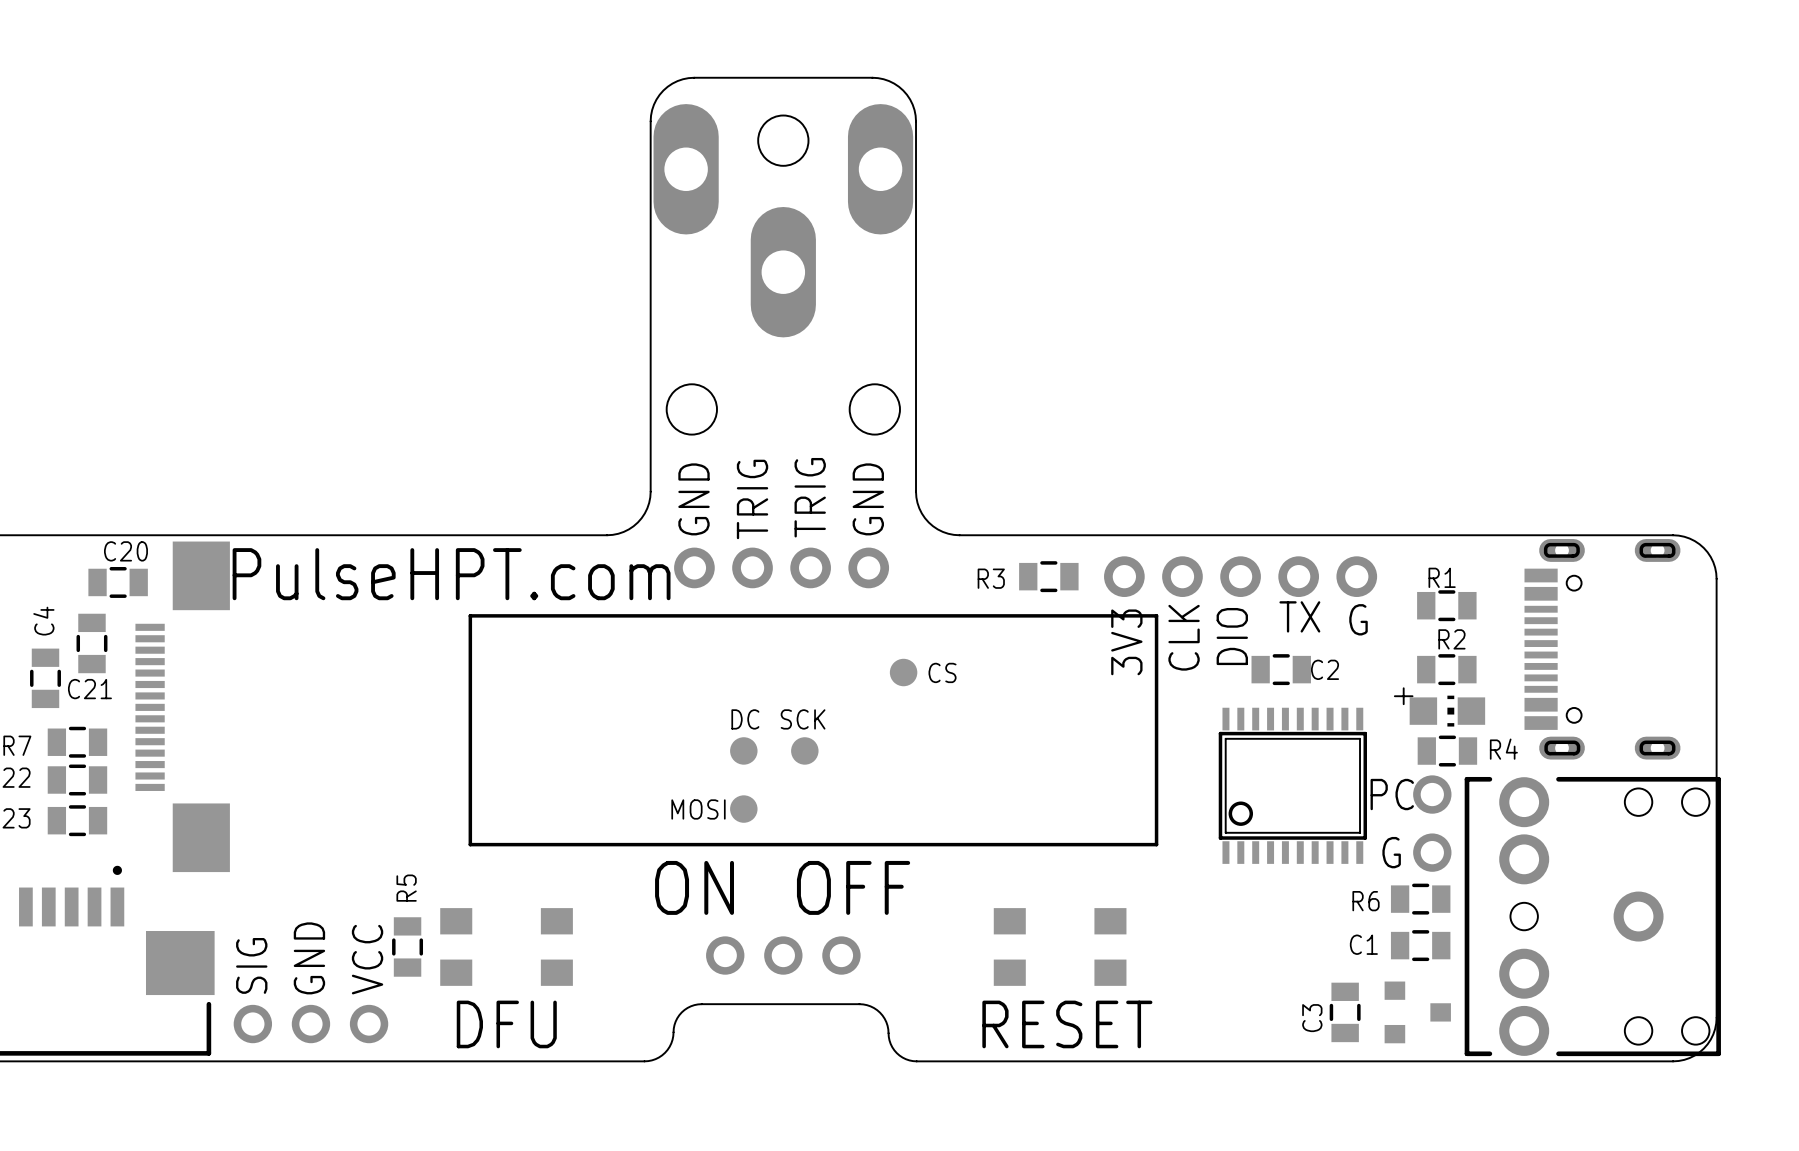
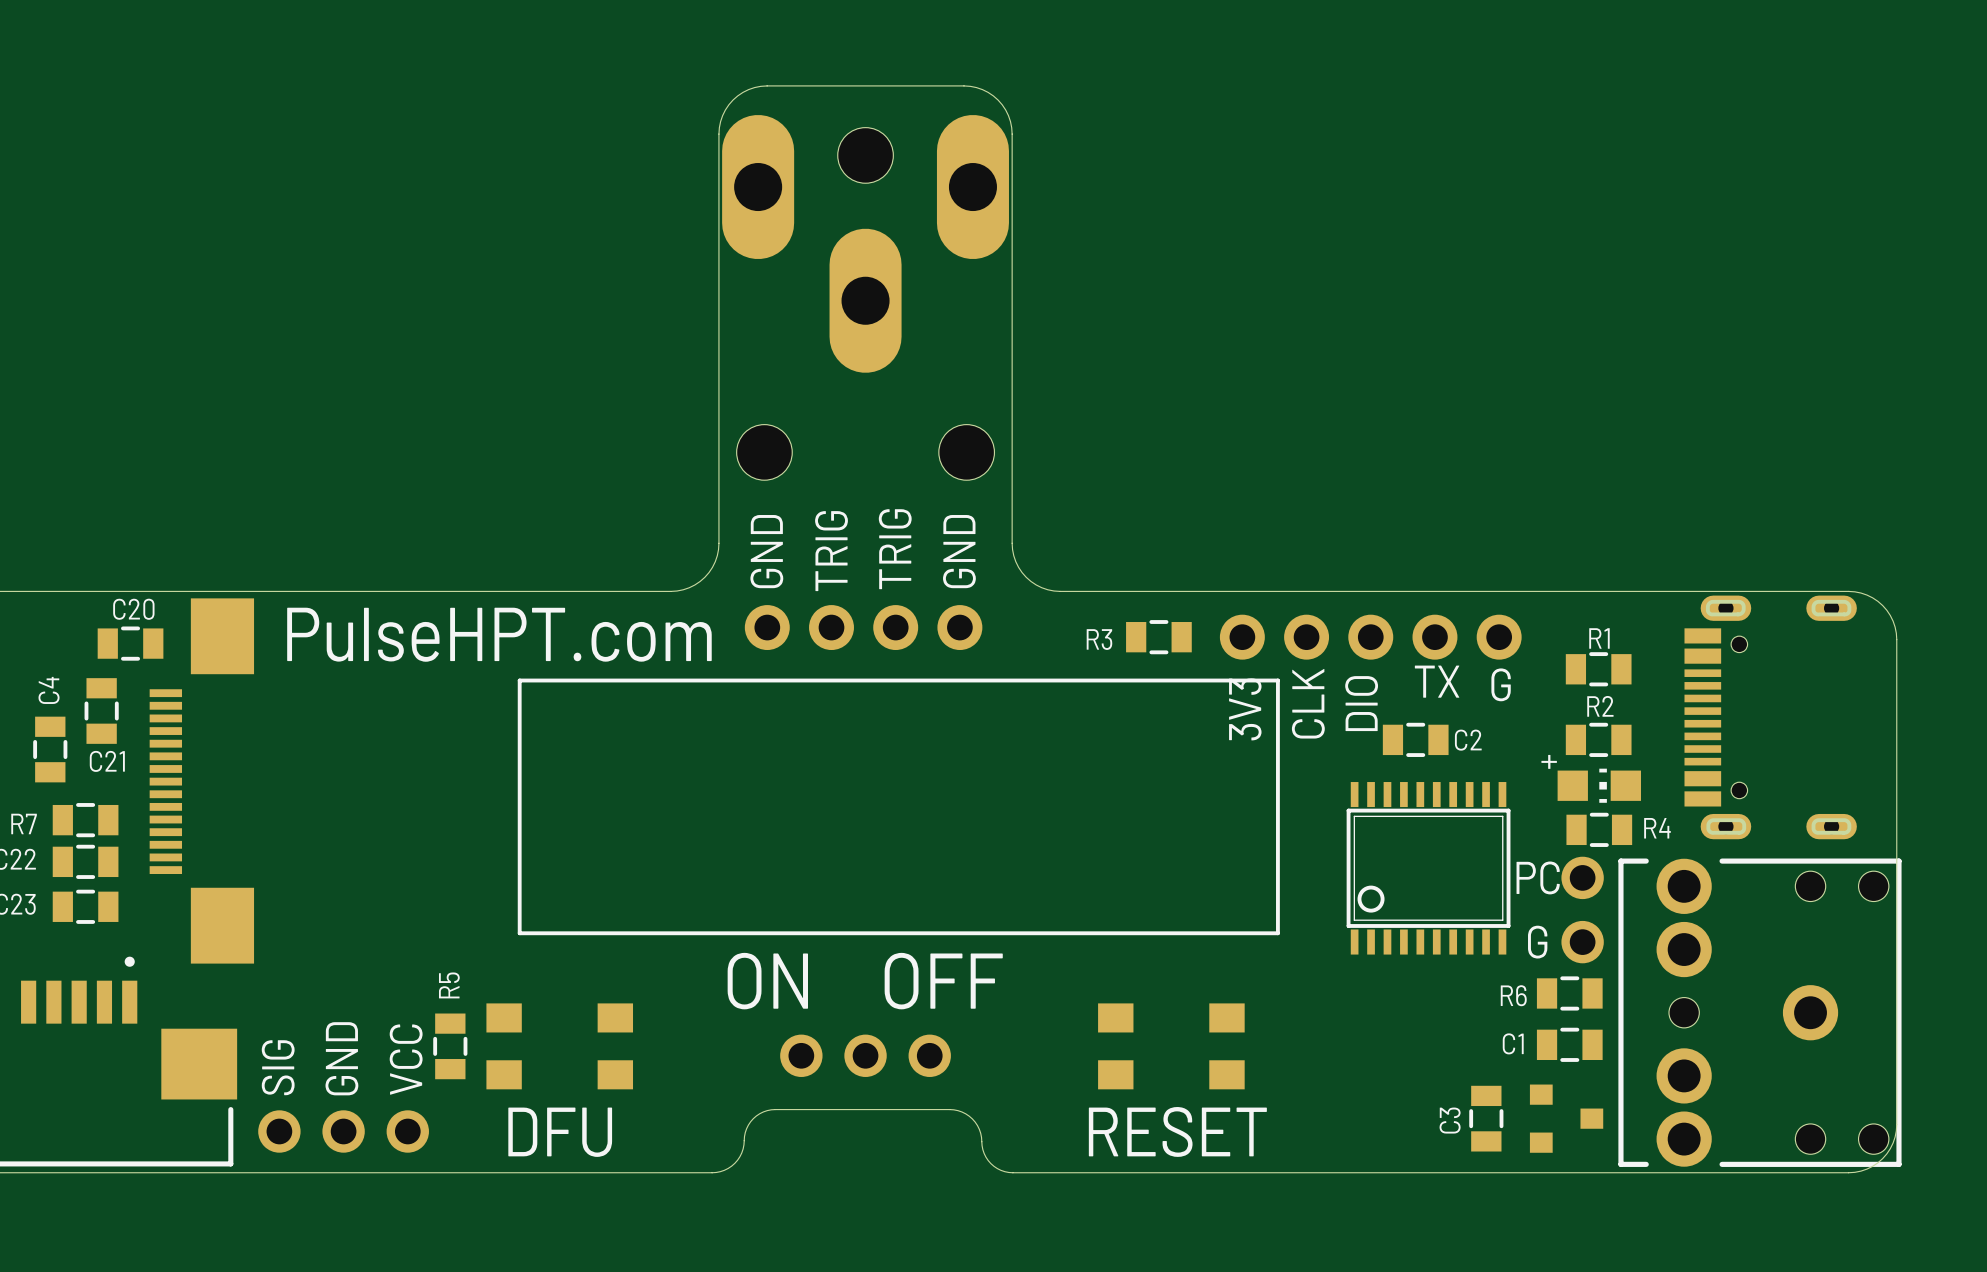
part: (903, 672) -> none
text: CS (942, 672) -> none
text: DC (745, 719) -> none
text: SCK (803, 719) -> none
part: (743, 750) -> none
part: (804, 750) -> none
text: MOSI (698, 809) -> none
part: (743, 809) -> none

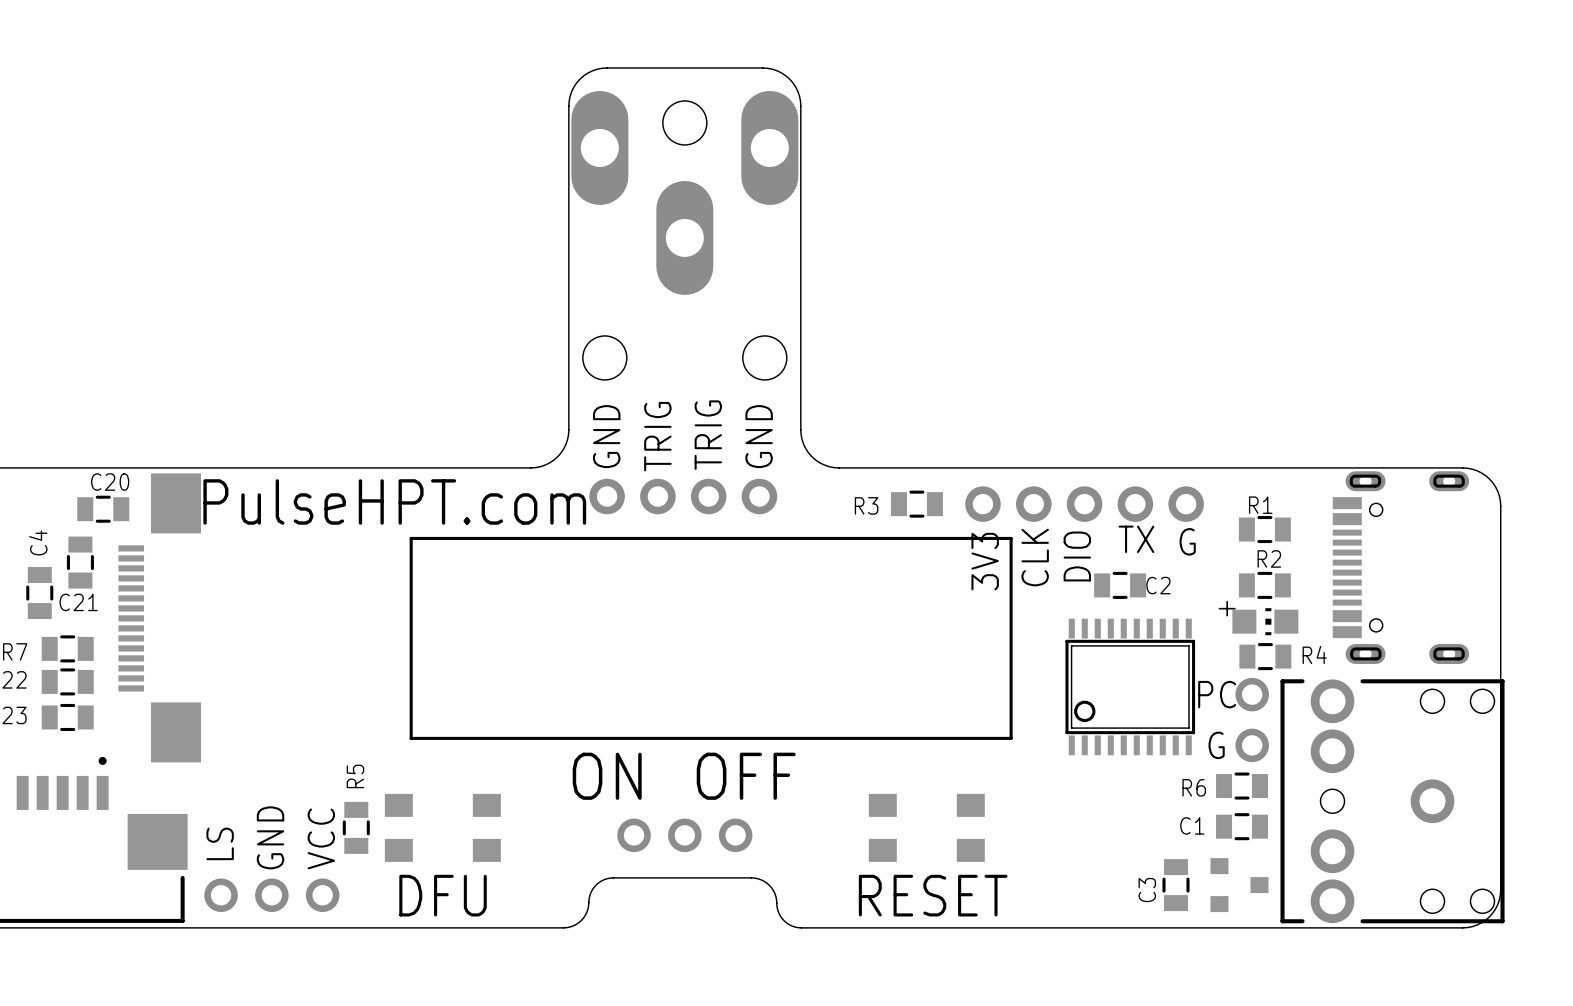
text: SIG (278, 1067) -> LS (220, 843)

